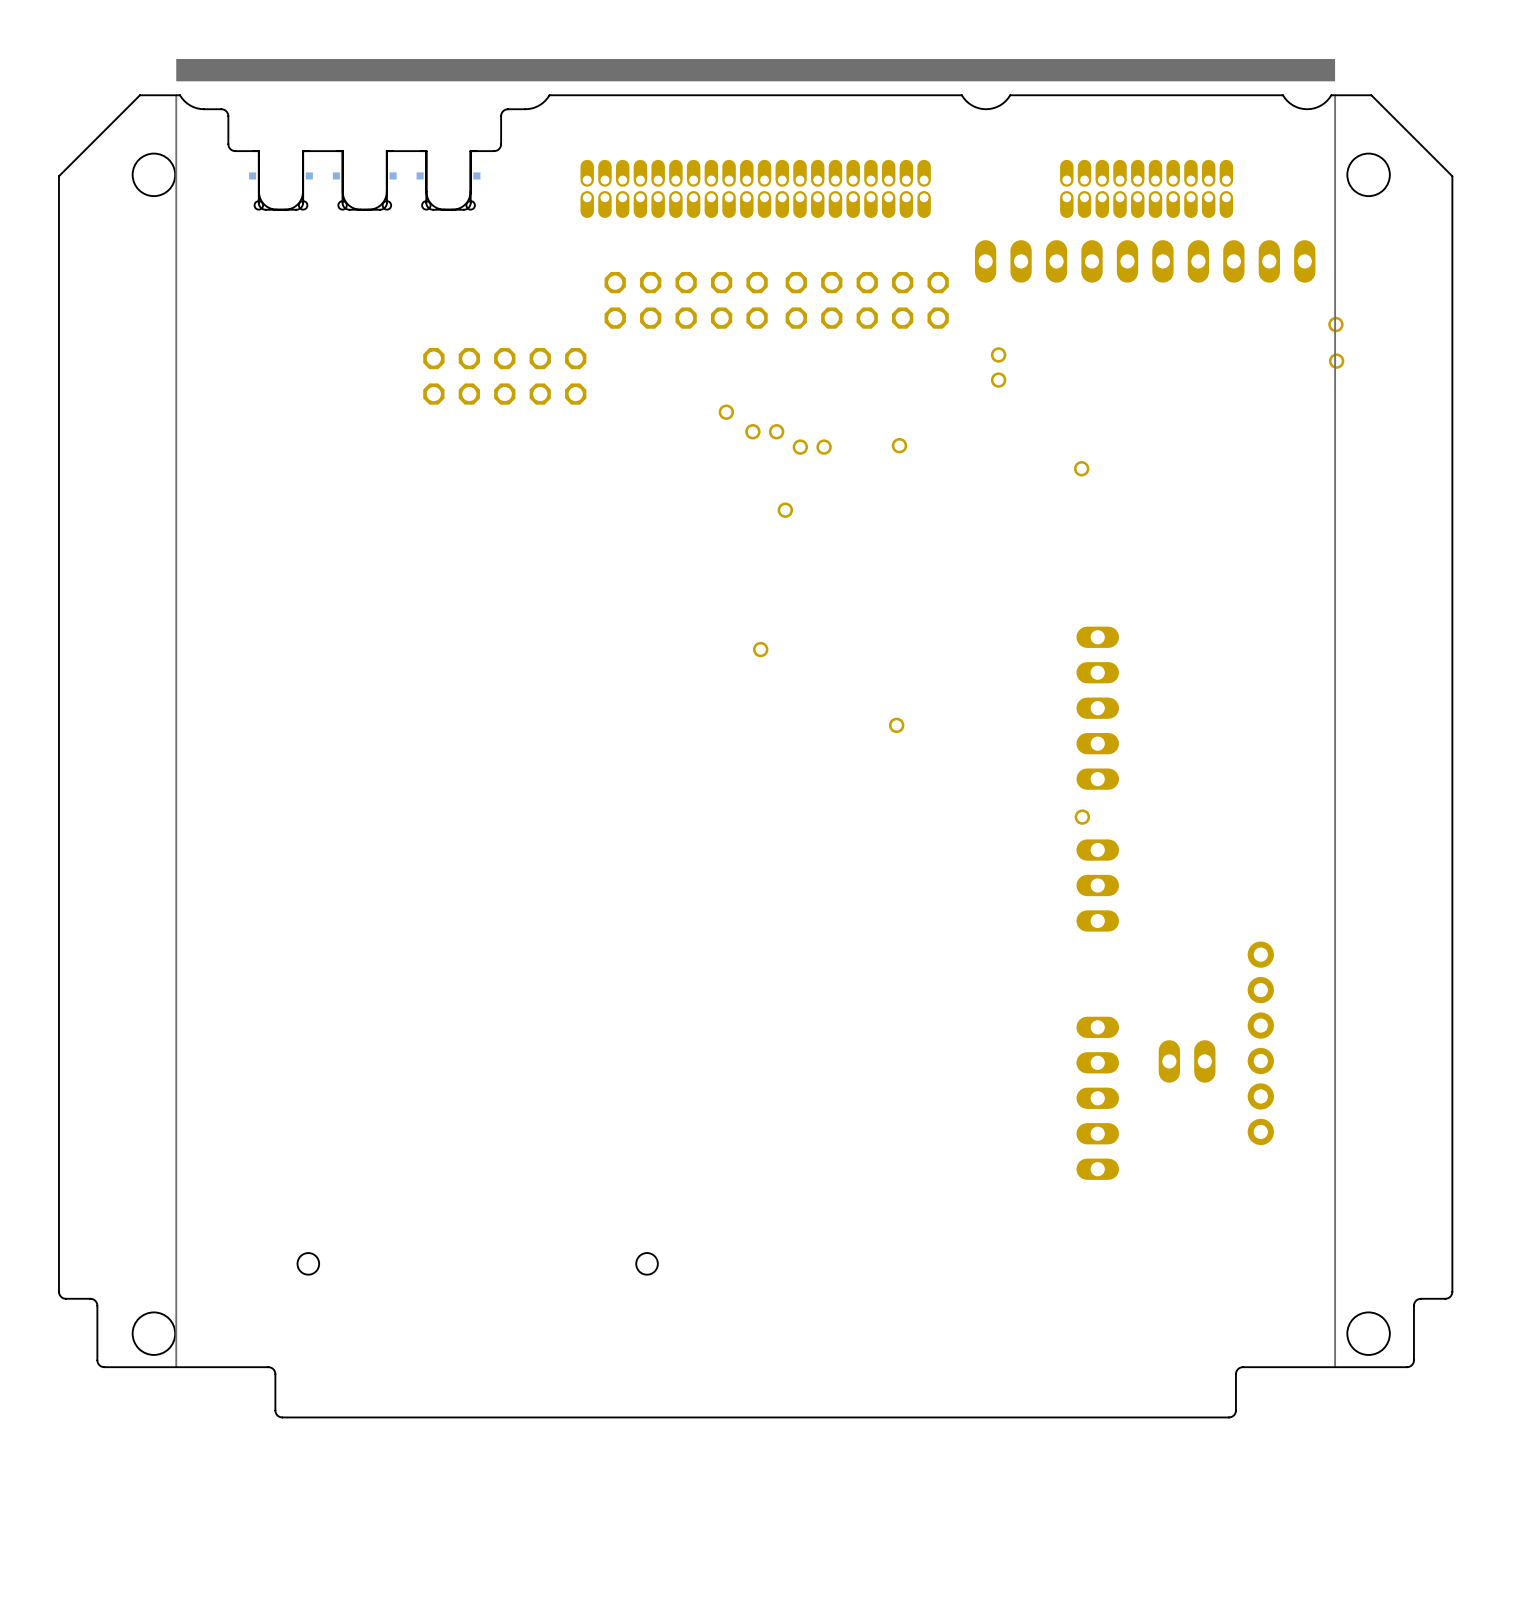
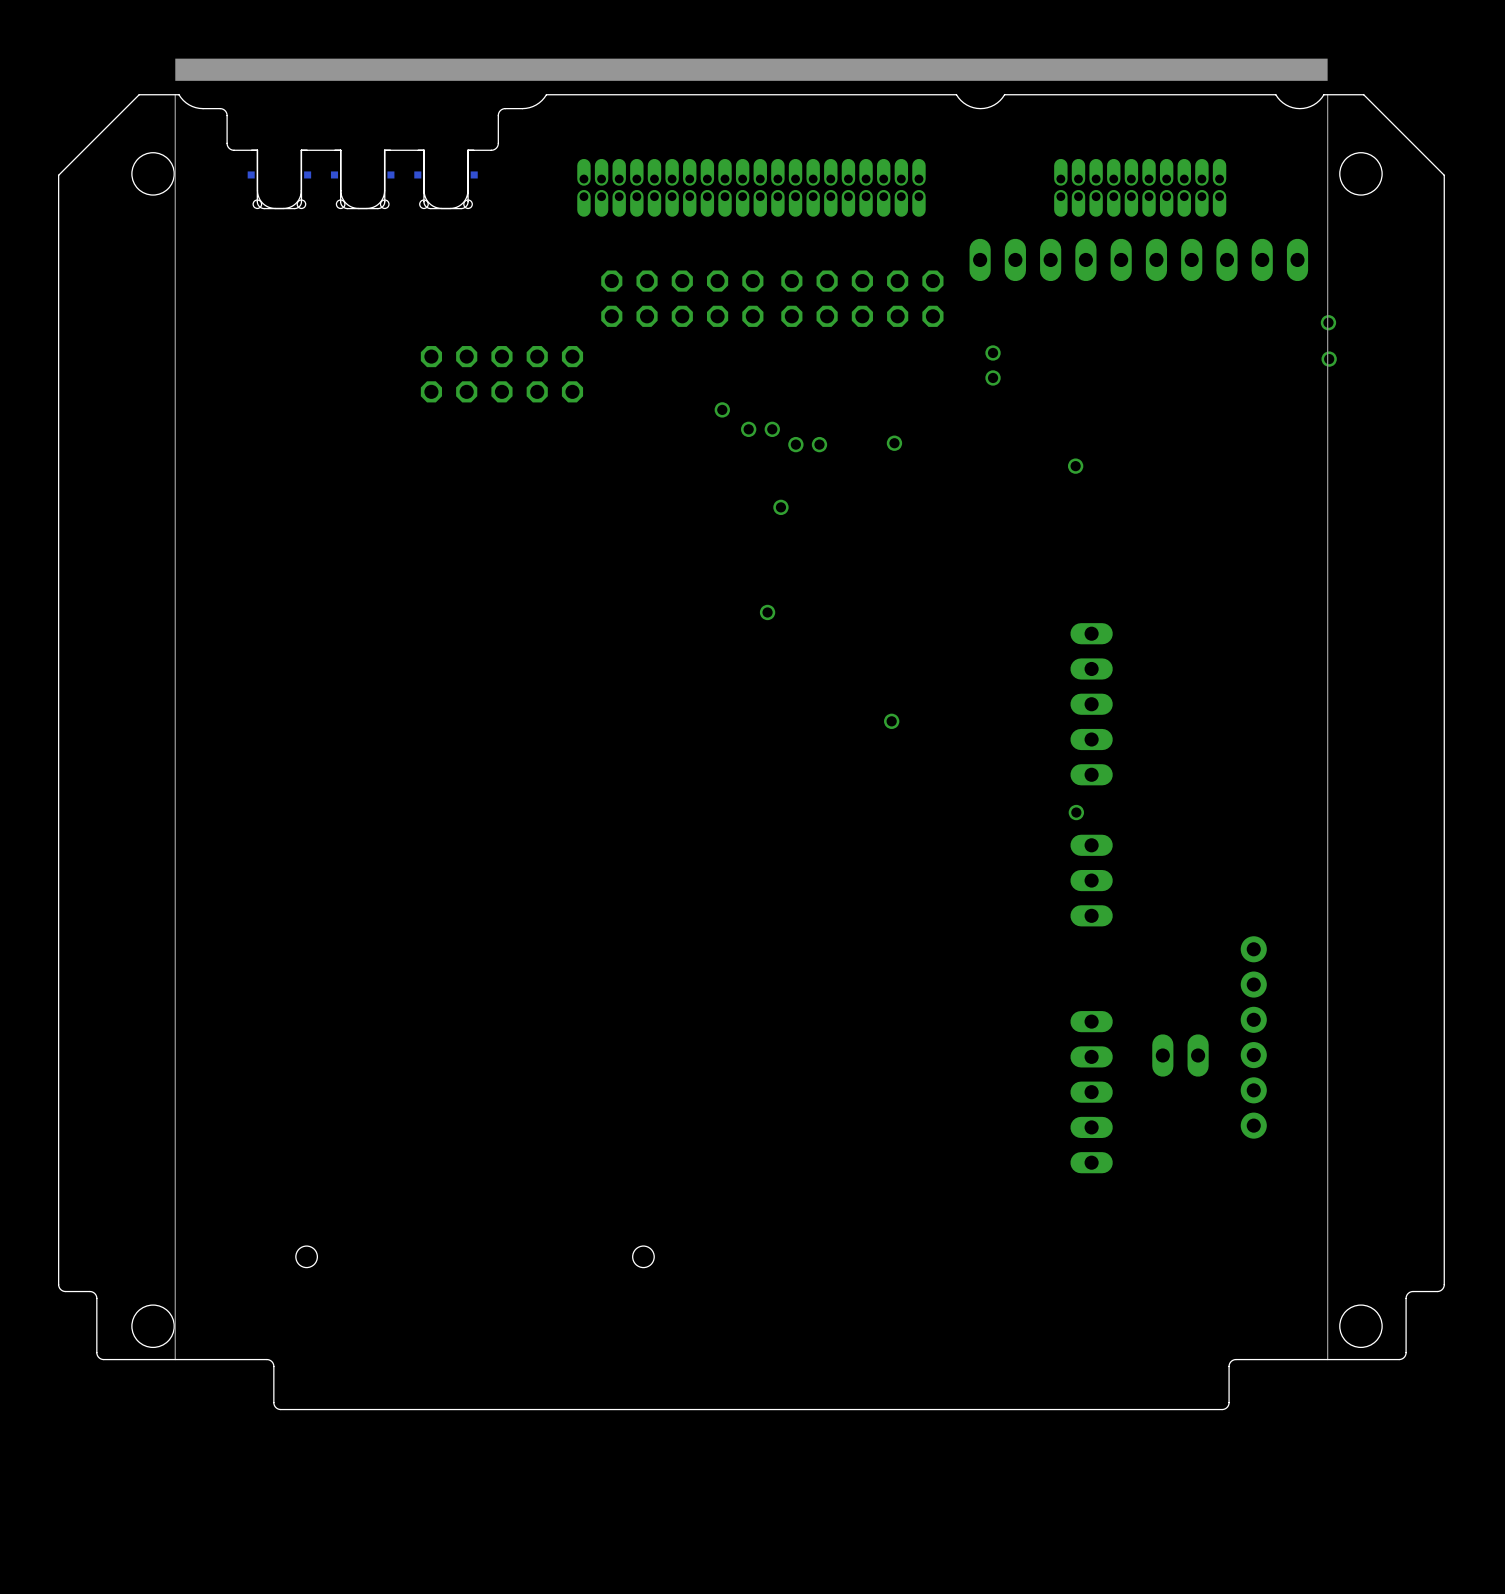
part position: (760, 649) -> (767, 612)

